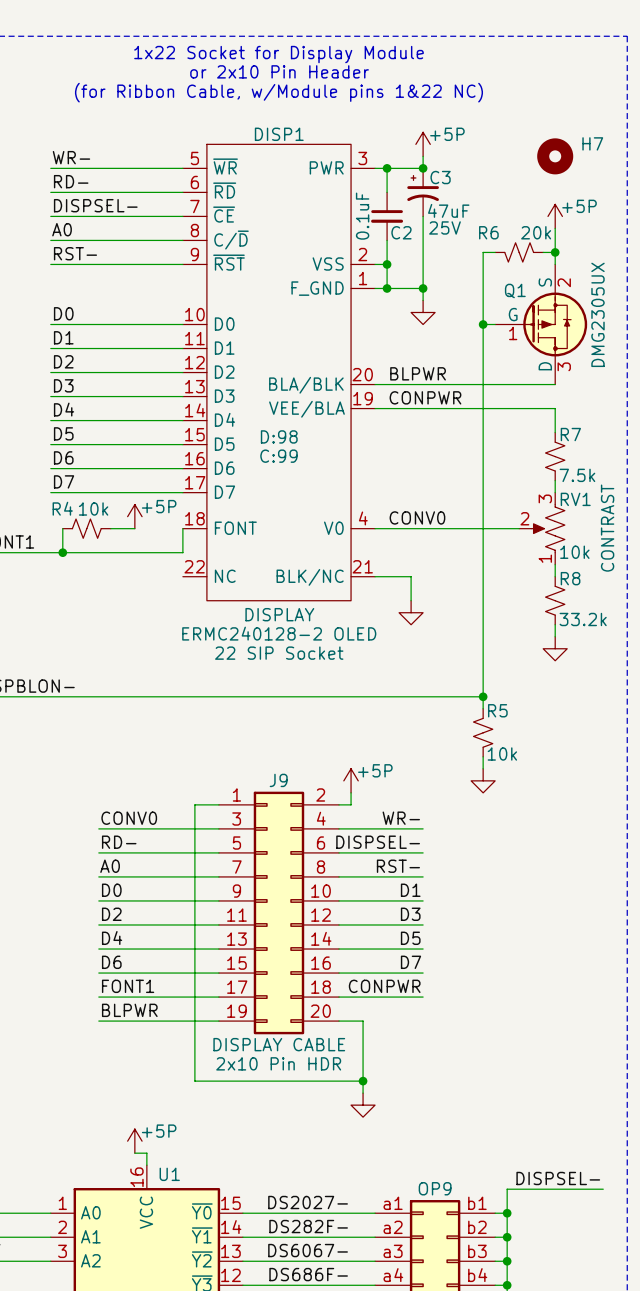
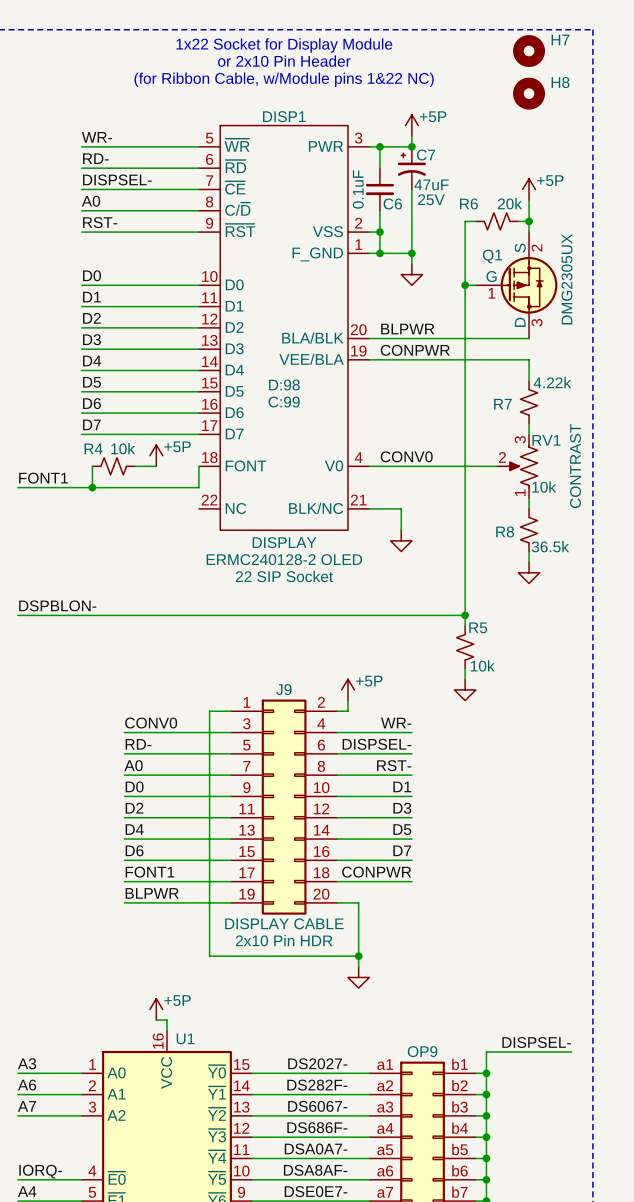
H8: none -> (529, 93)
H7 position: (555, 156) -> (529, 51)
C3 name: C3 (440, 177) -> C7 (426, 154)
C2 name: C2 (401, 232) -> C6 (392, 203)
R7 name position: R7 (570, 434) -> R7 (502, 404)
R7 value: 7.5k (577, 475) -> 4.22k (552, 382)
R8 name position: R8 (570, 578) -> R8 (505, 531)
R8 value: 33.2k (583, 619) -> 36.5k (550, 546)

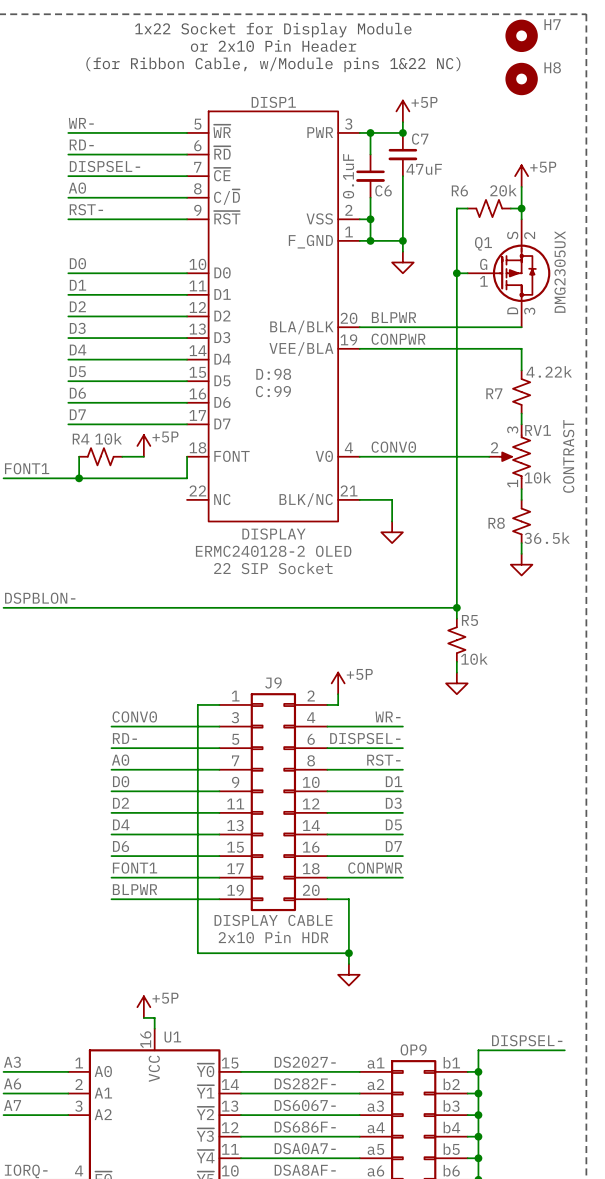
C7 symbol: [397, 146, 426, 190] -> [388, 132, 418, 177]
C7 text: 25V (431, 199) -> none

